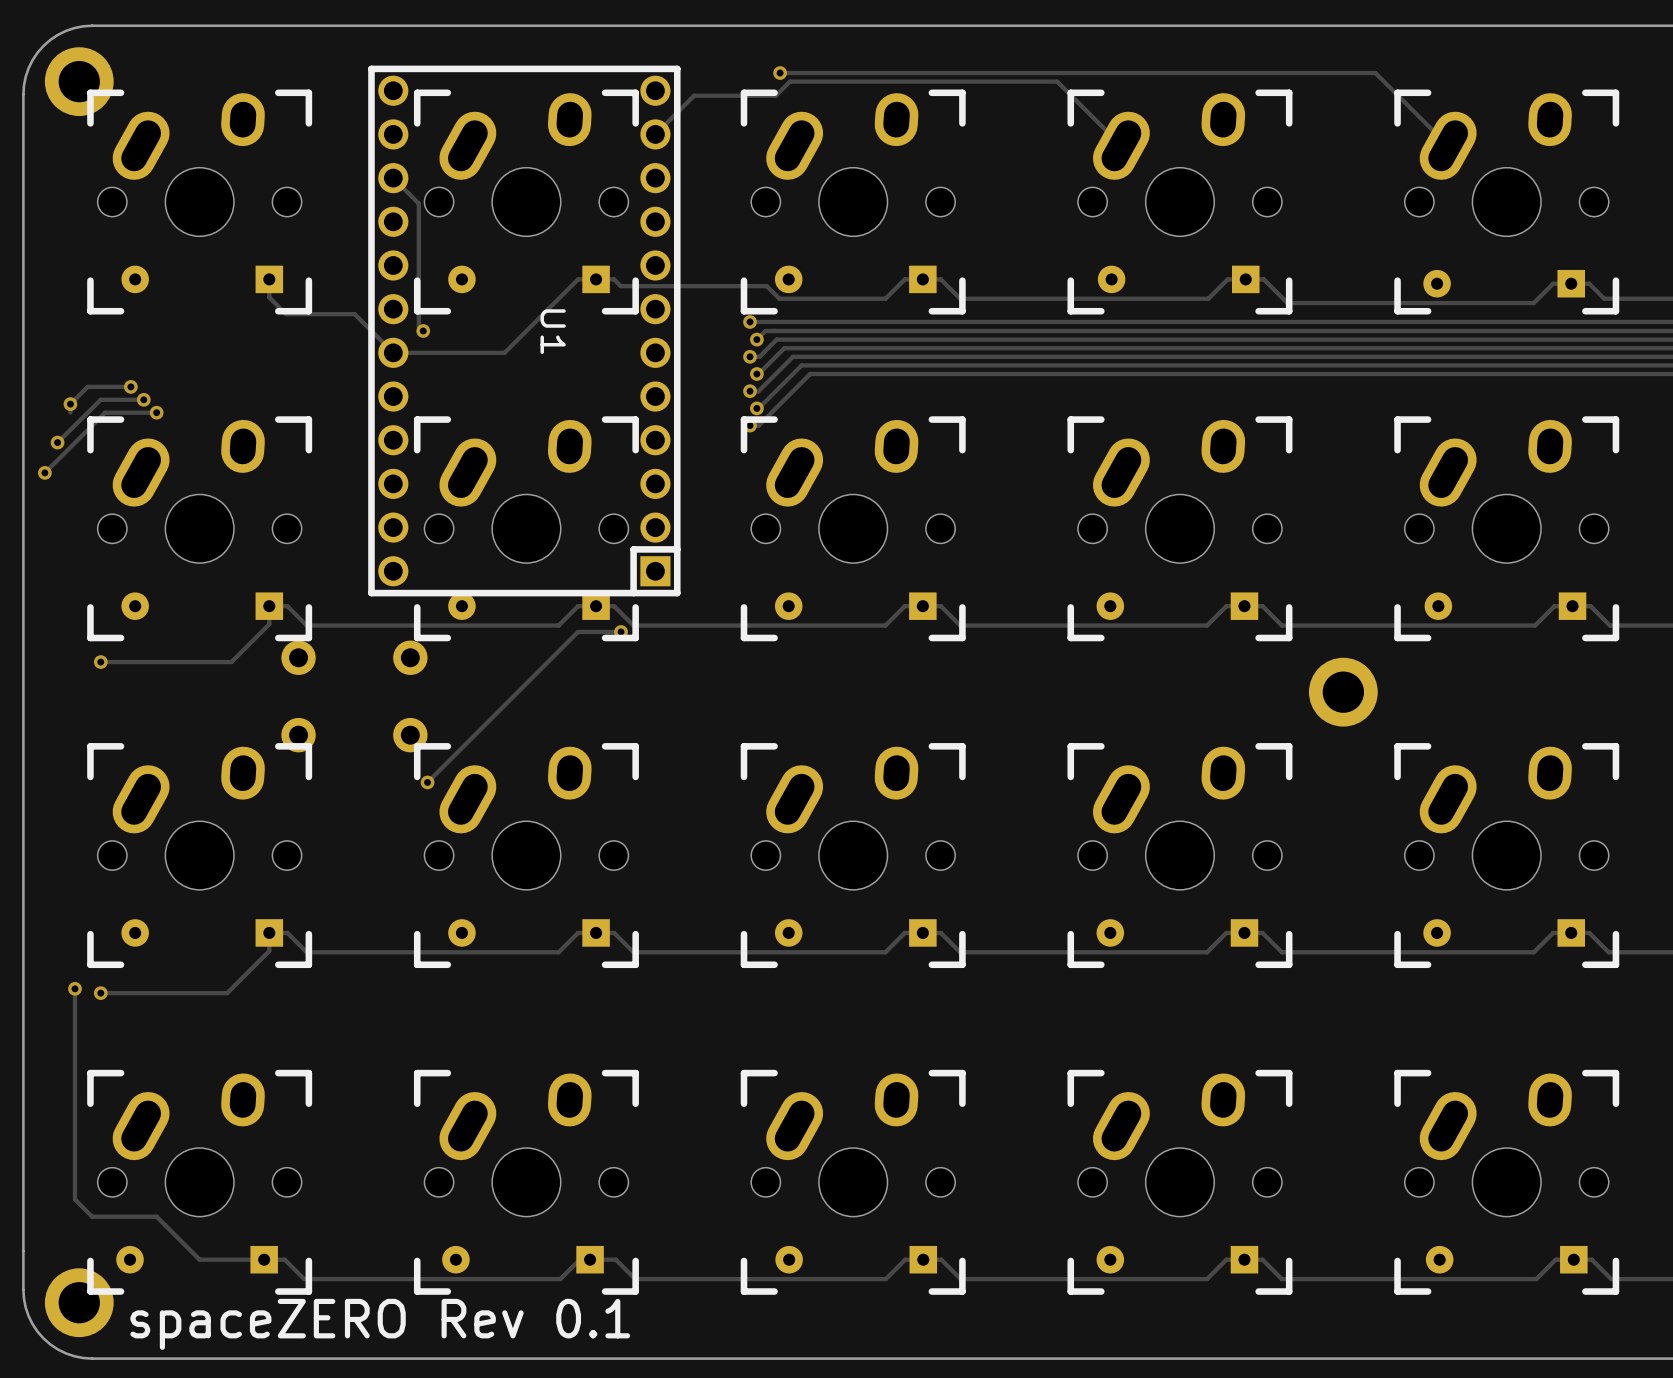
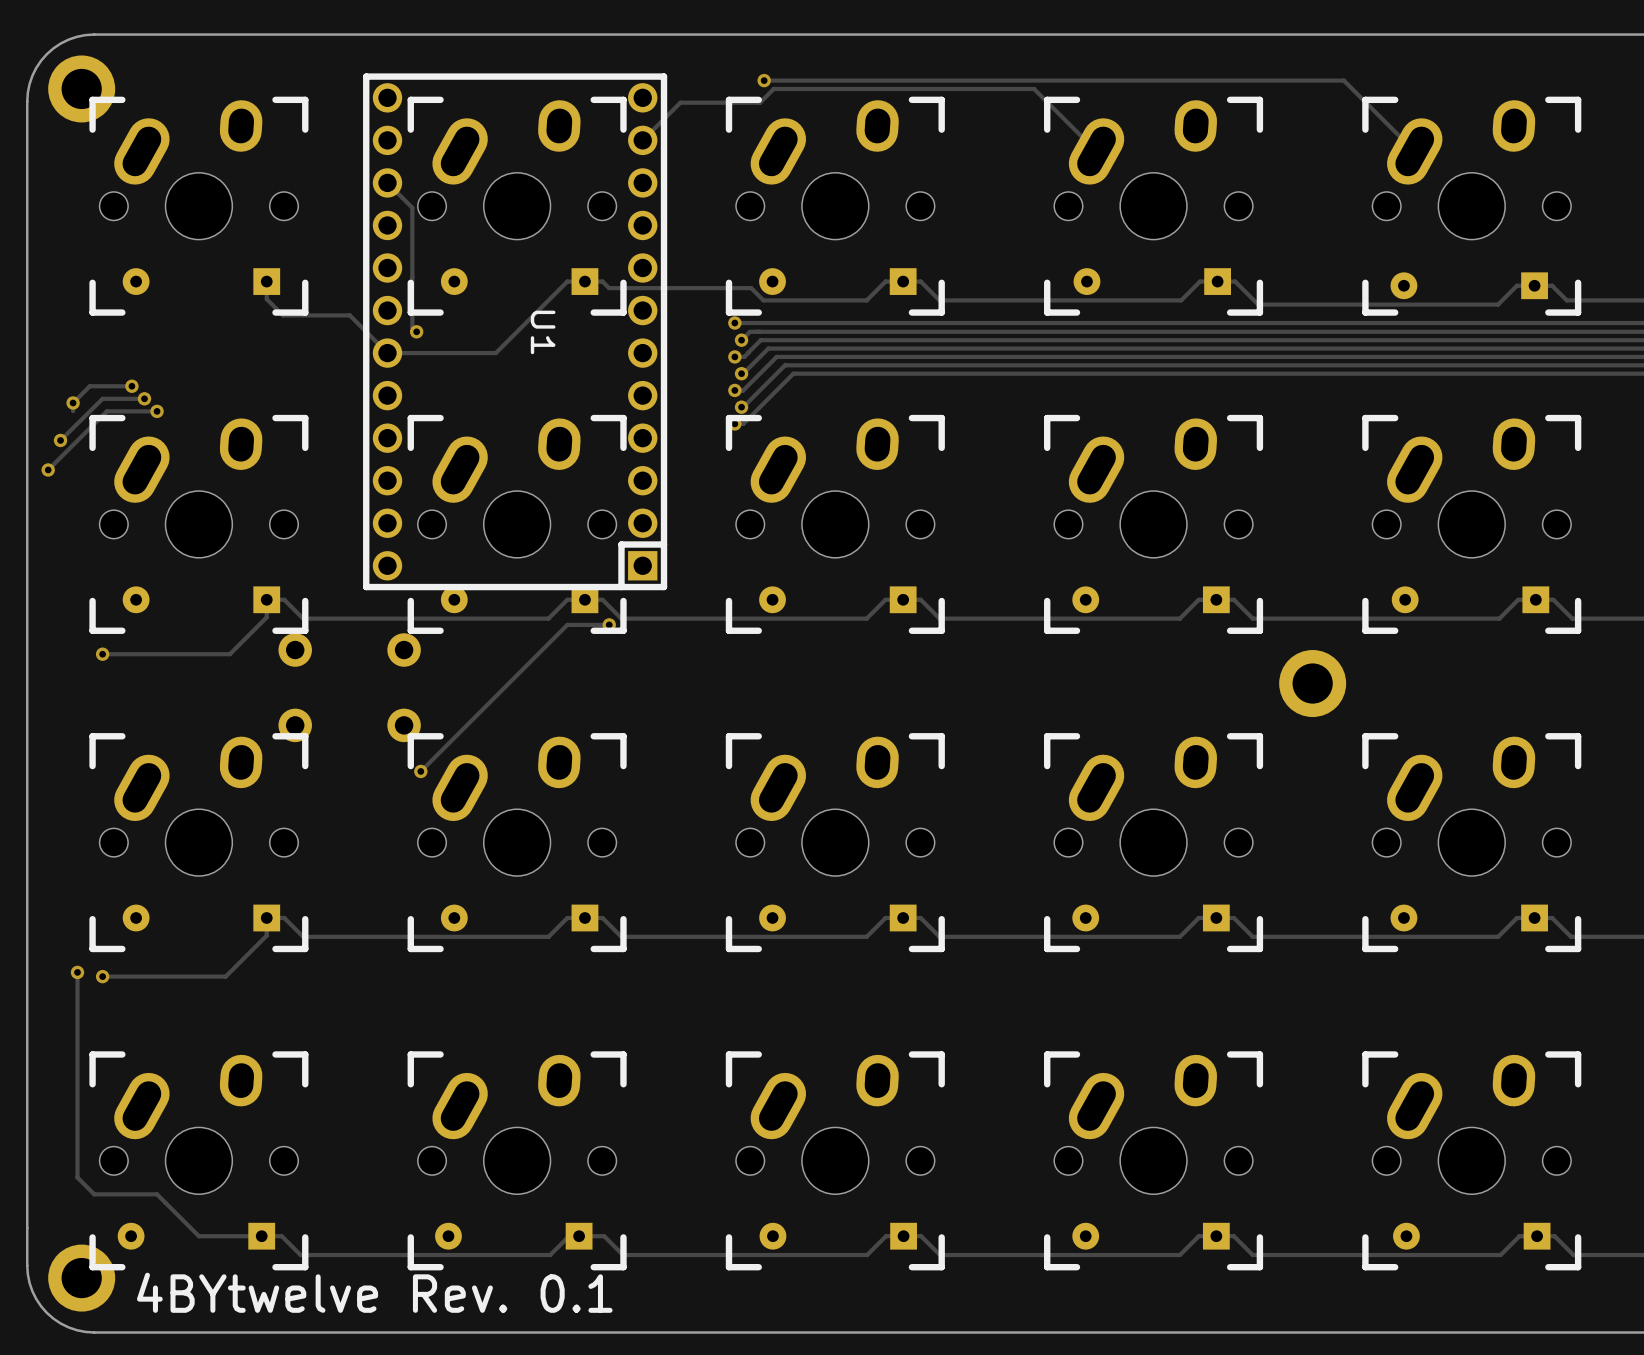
text: spaceZERO Rev 0.1 (380, 1324) -> 4BYtwelve Rev. 0.1 (374, 1292)

